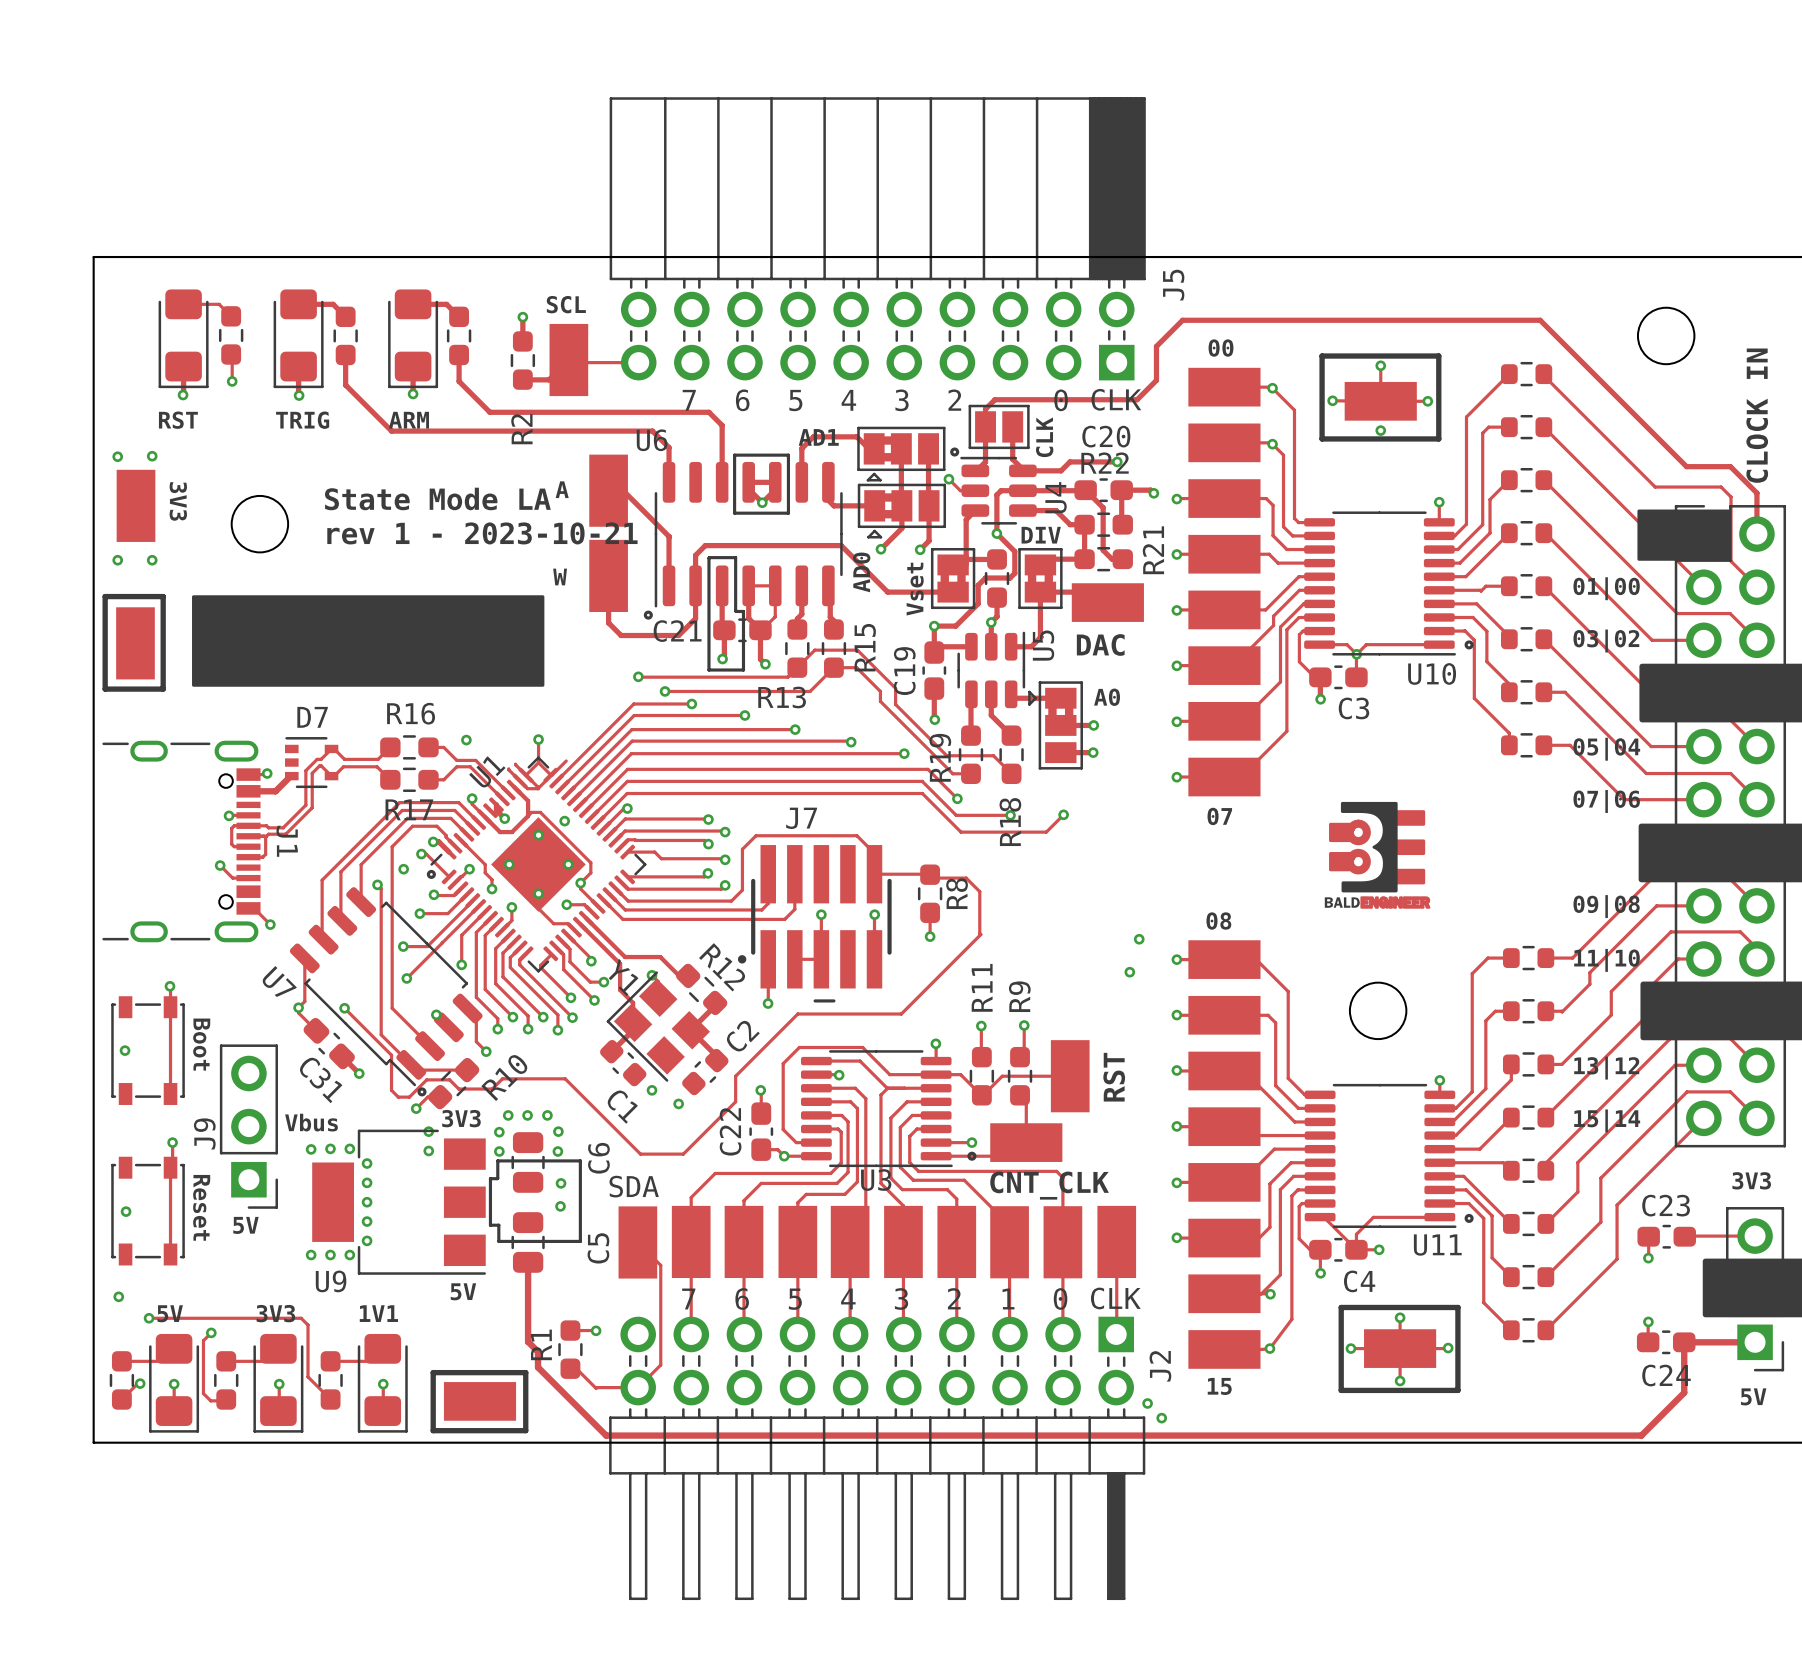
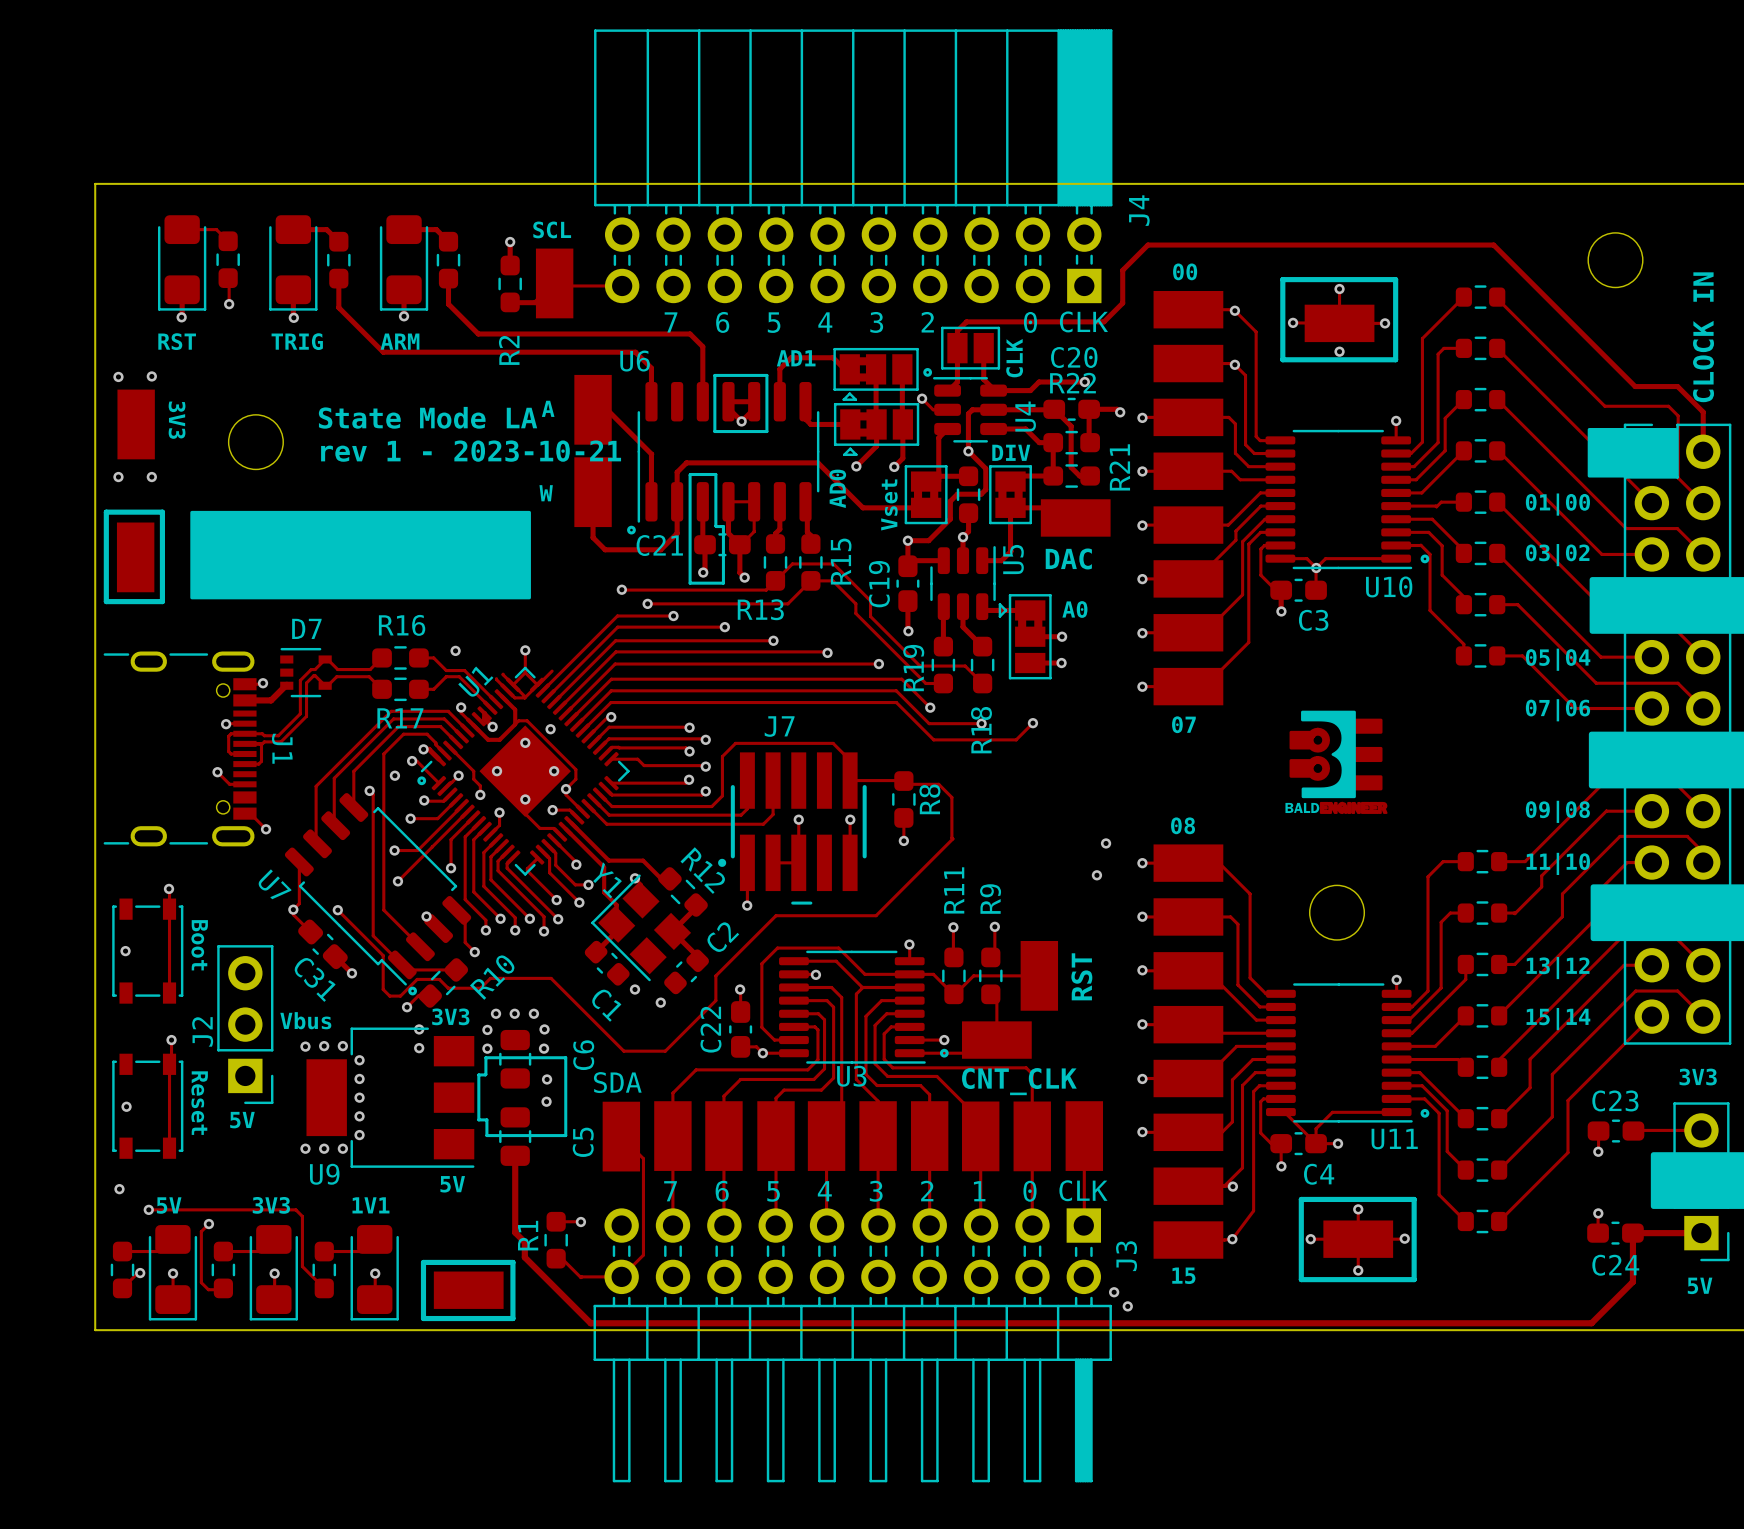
J5 name: J5 (1173, 285) -> J4 (1139, 210)
J9 name: J9 (204, 1133) -> J2 (202, 1031)
J2 name: J2 (1160, 1366) -> J3 (1126, 1256)

